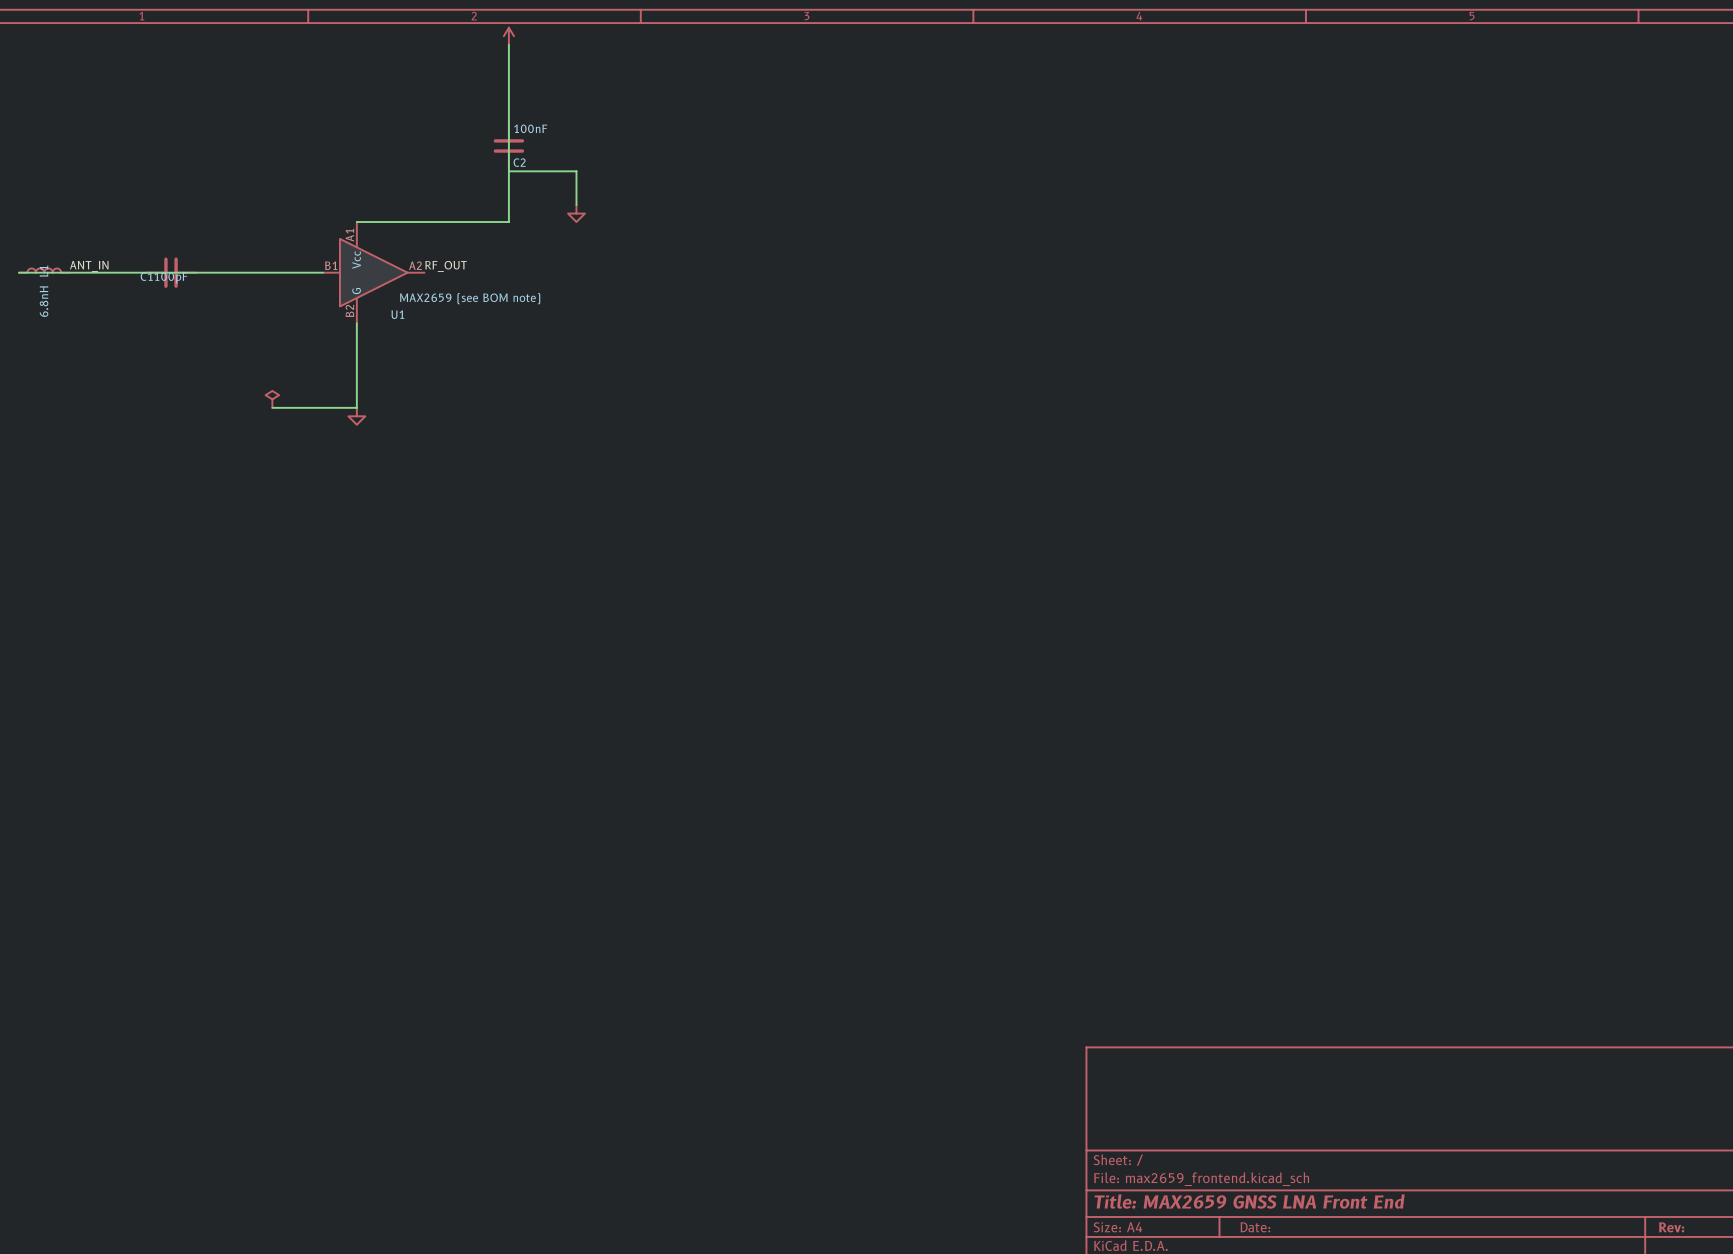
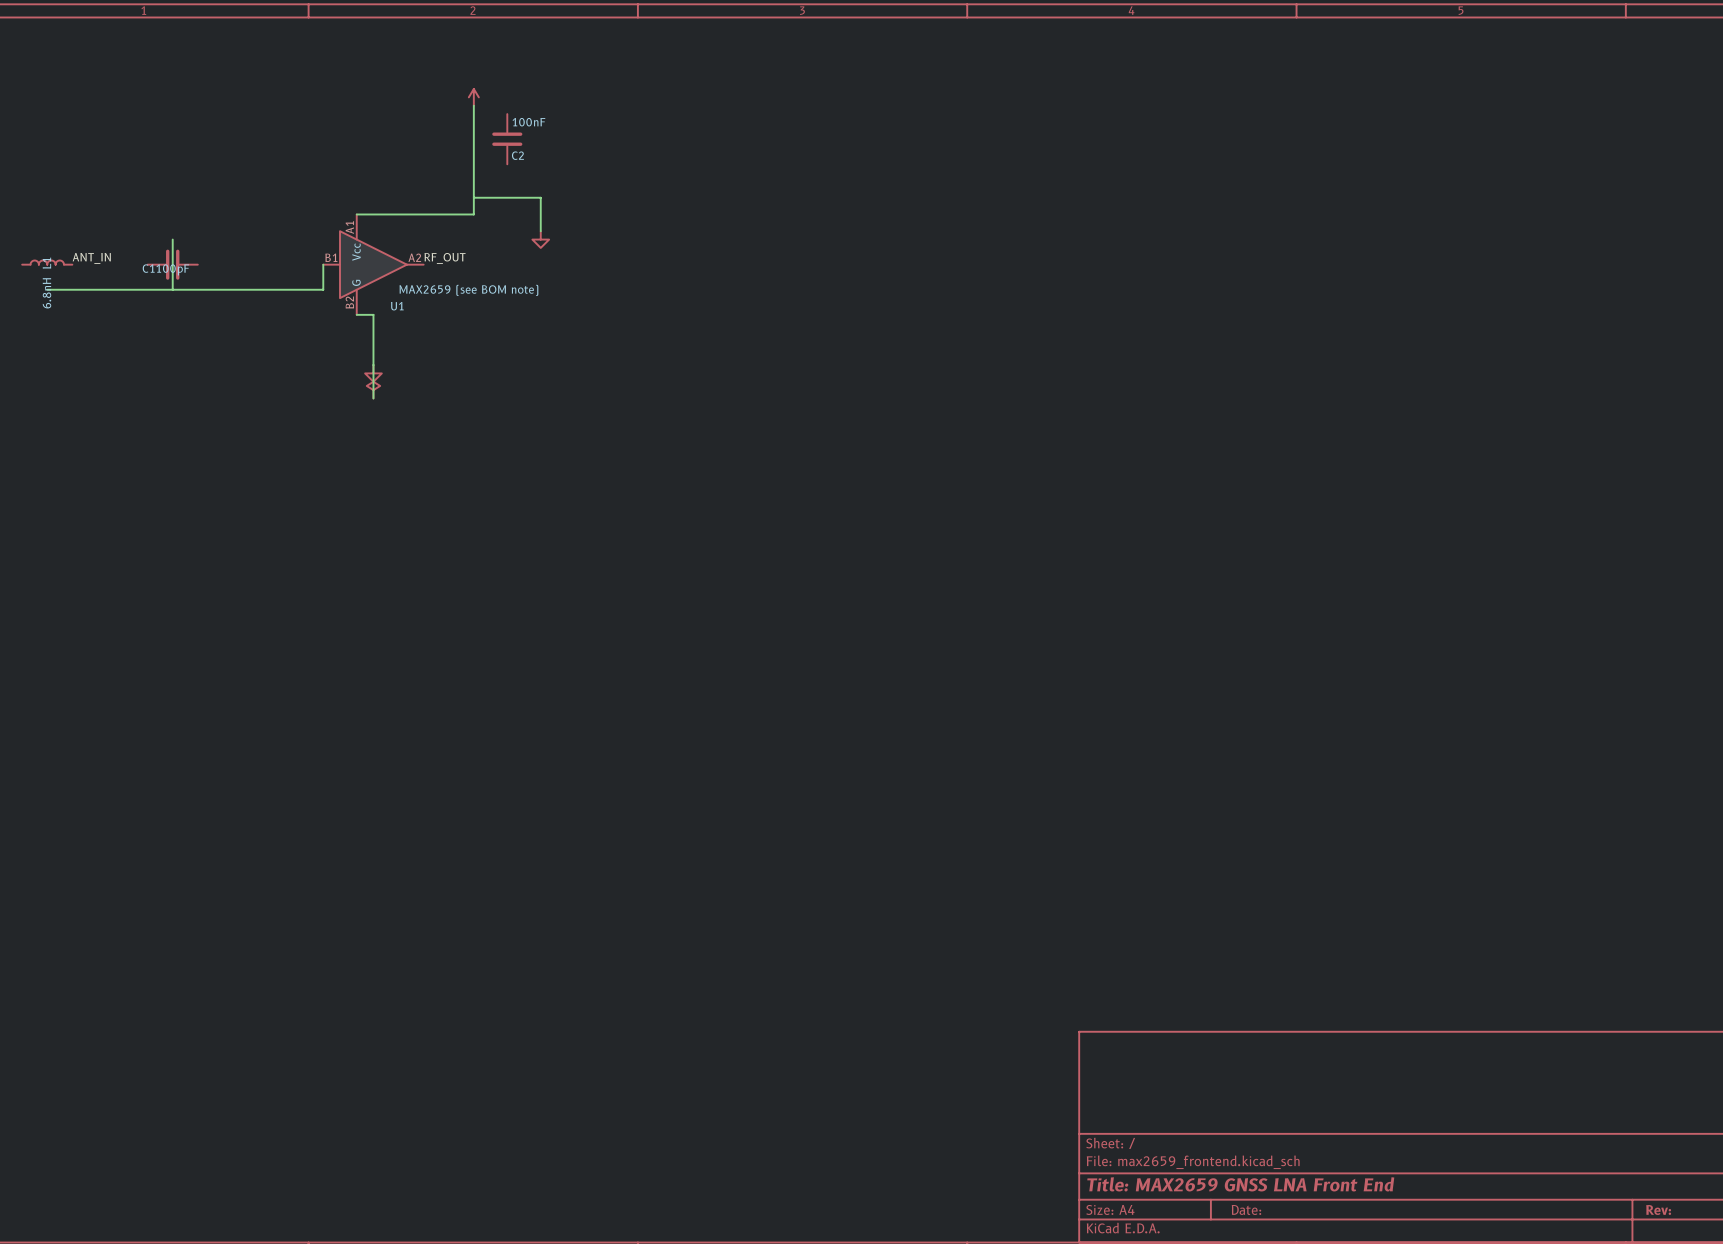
power symbol position: (508, 36) -> (473, 97)
wire: (508, 44) (508, 222) (475, 222) -> (473, 105) (473, 214)
wire: (508, 171) (576, 171) (576, 205) -> (473, 197) (540, 197) (540, 231)
power symbol position: (576, 213) -> (540, 239)
wire: none -> (172, 239) (172, 289)
wire: (18, 272) (323, 272) -> (47, 289) (323, 289) (323, 264)
wire: (356, 323) (356, 407) (272, 407) -> (356, 314) (373, 314) (373, 398)
power symbol position: (272, 399) -> (373, 390)
power symbol position: (356, 416) -> (373, 373)

